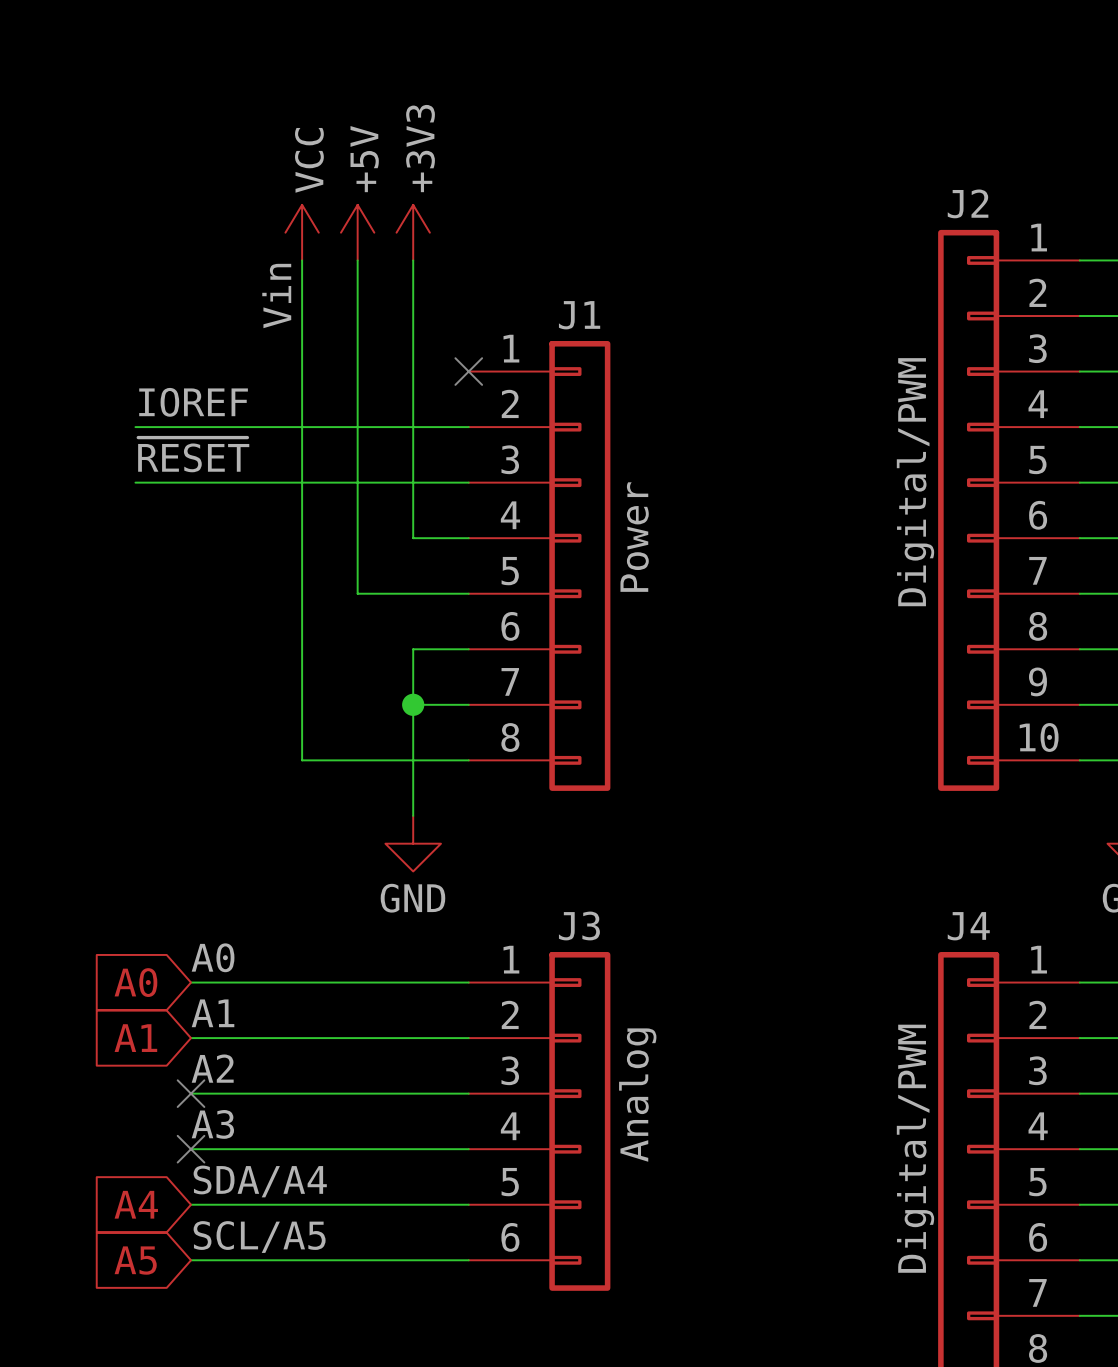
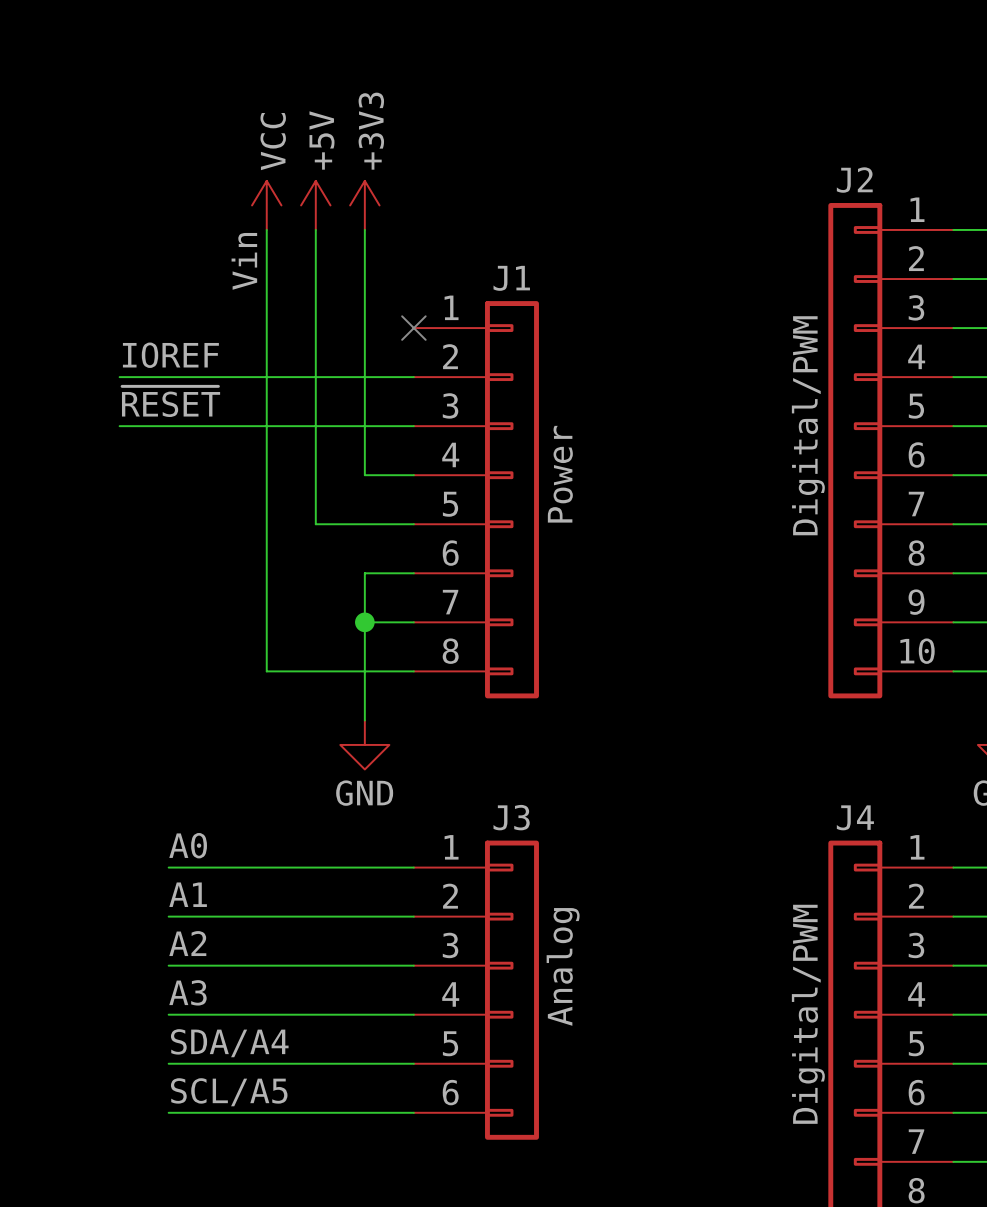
global label: A0 (135, 982) -> none
global label: A1 (135, 1038) -> none
no-connect mark: (191, 1093) -> none
no-connect mark: (191, 1149) -> none
global label: A4 (136, 1204) -> none
global label: A5 (135, 1260) -> none

